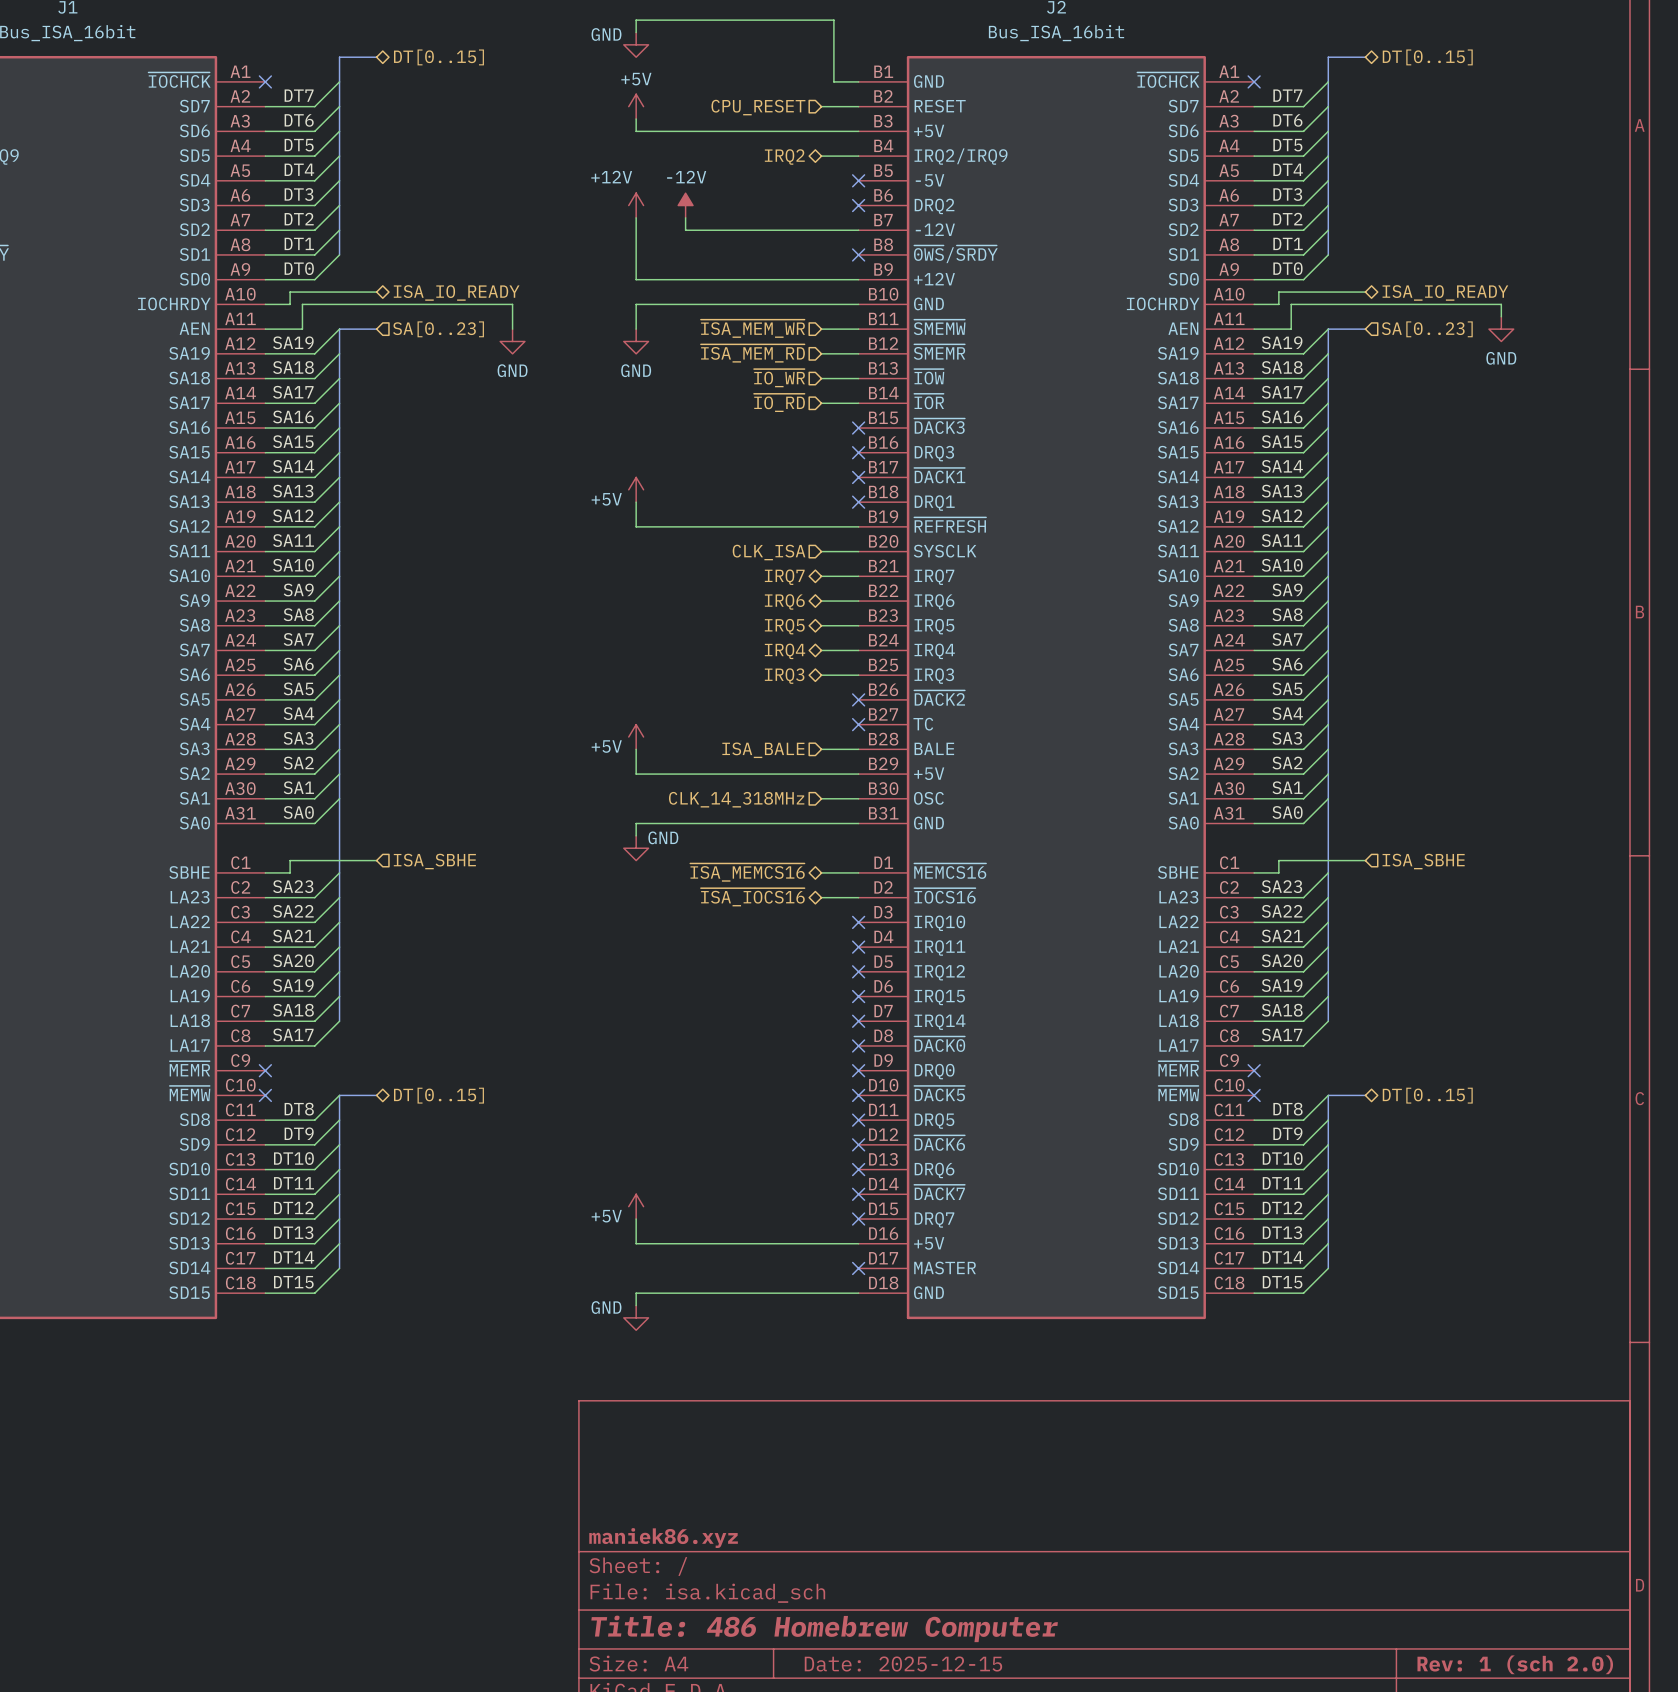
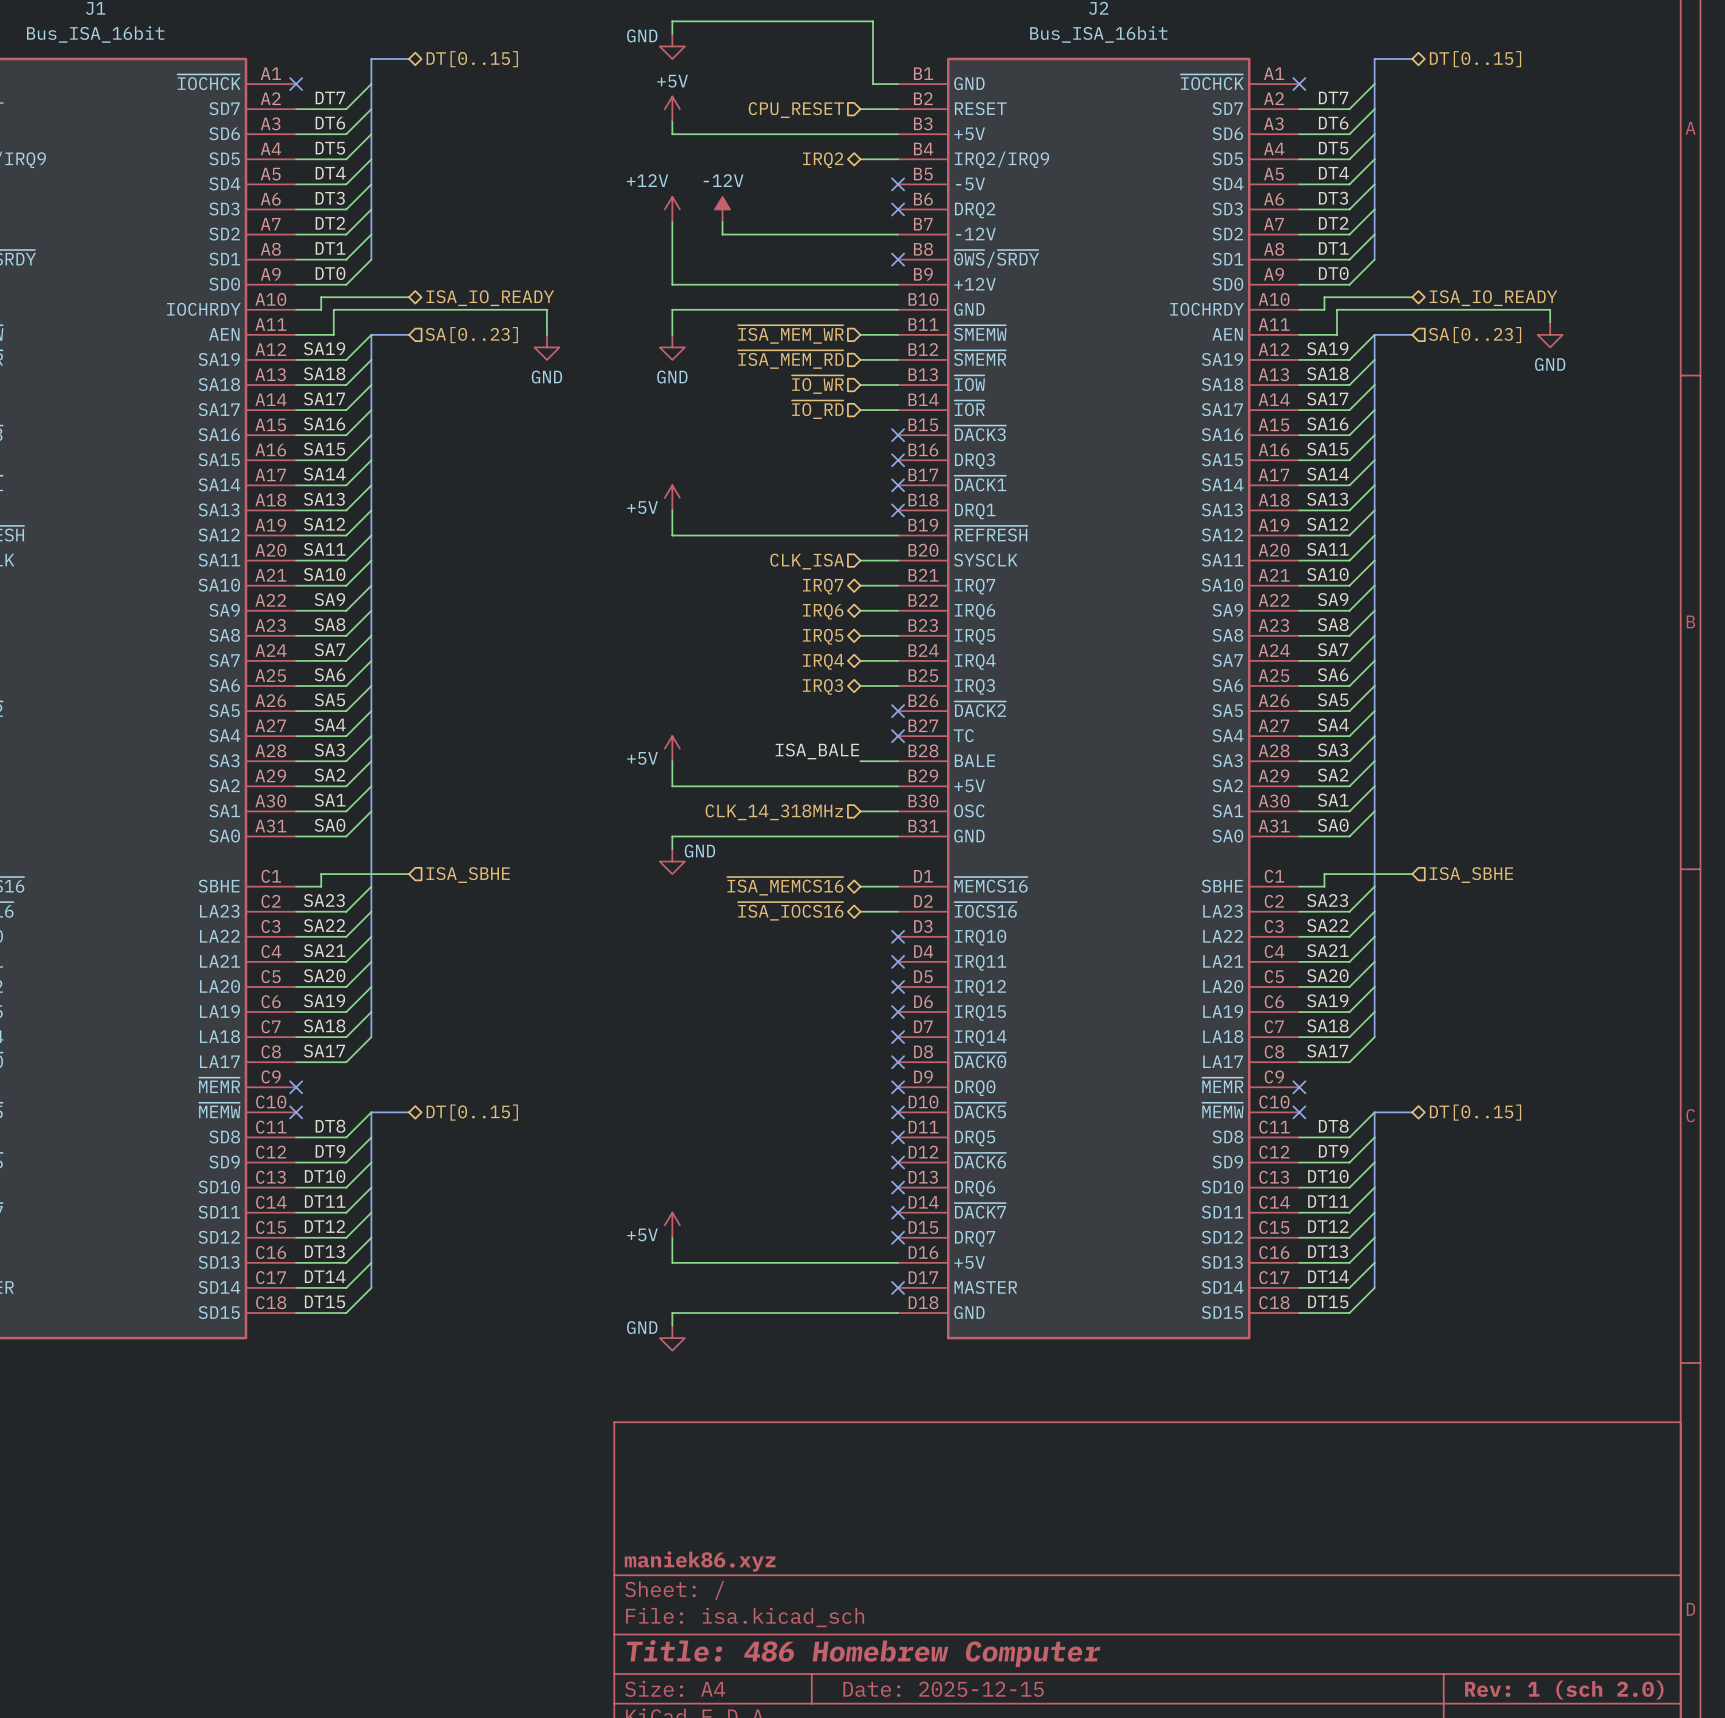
label: none -> ISA_BALE (817, 751)
hierarchical label: ISA_BALE (763, 750) -> none

